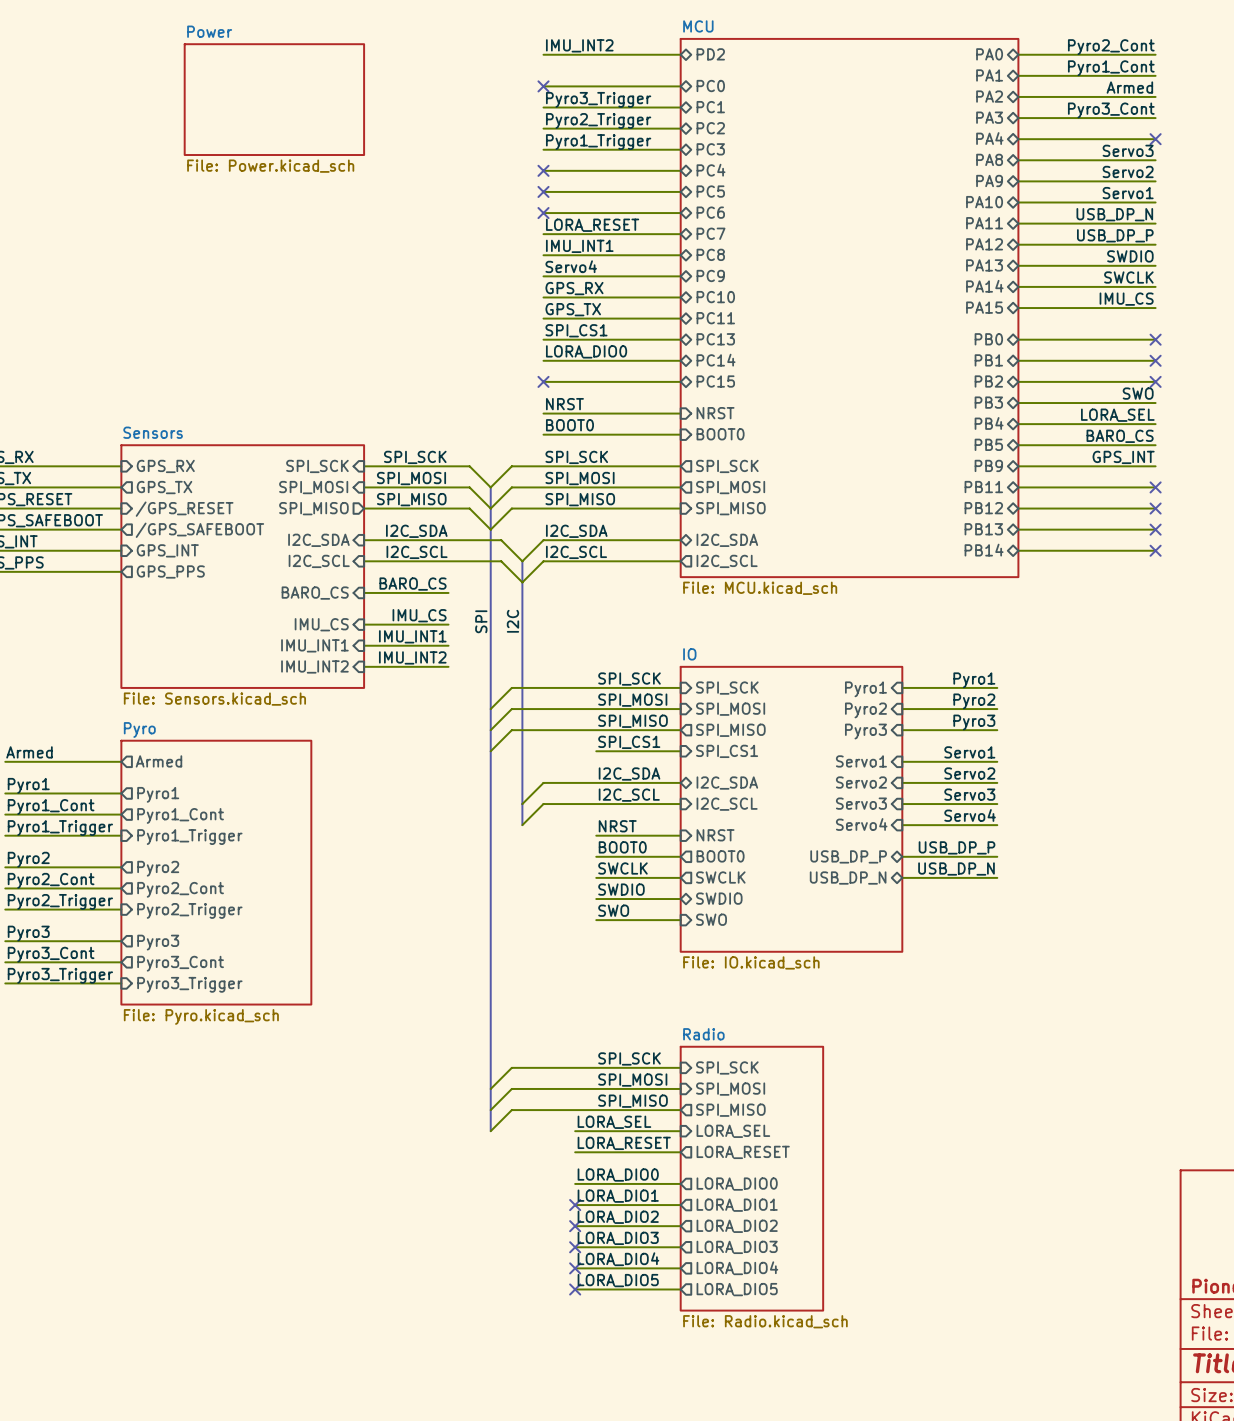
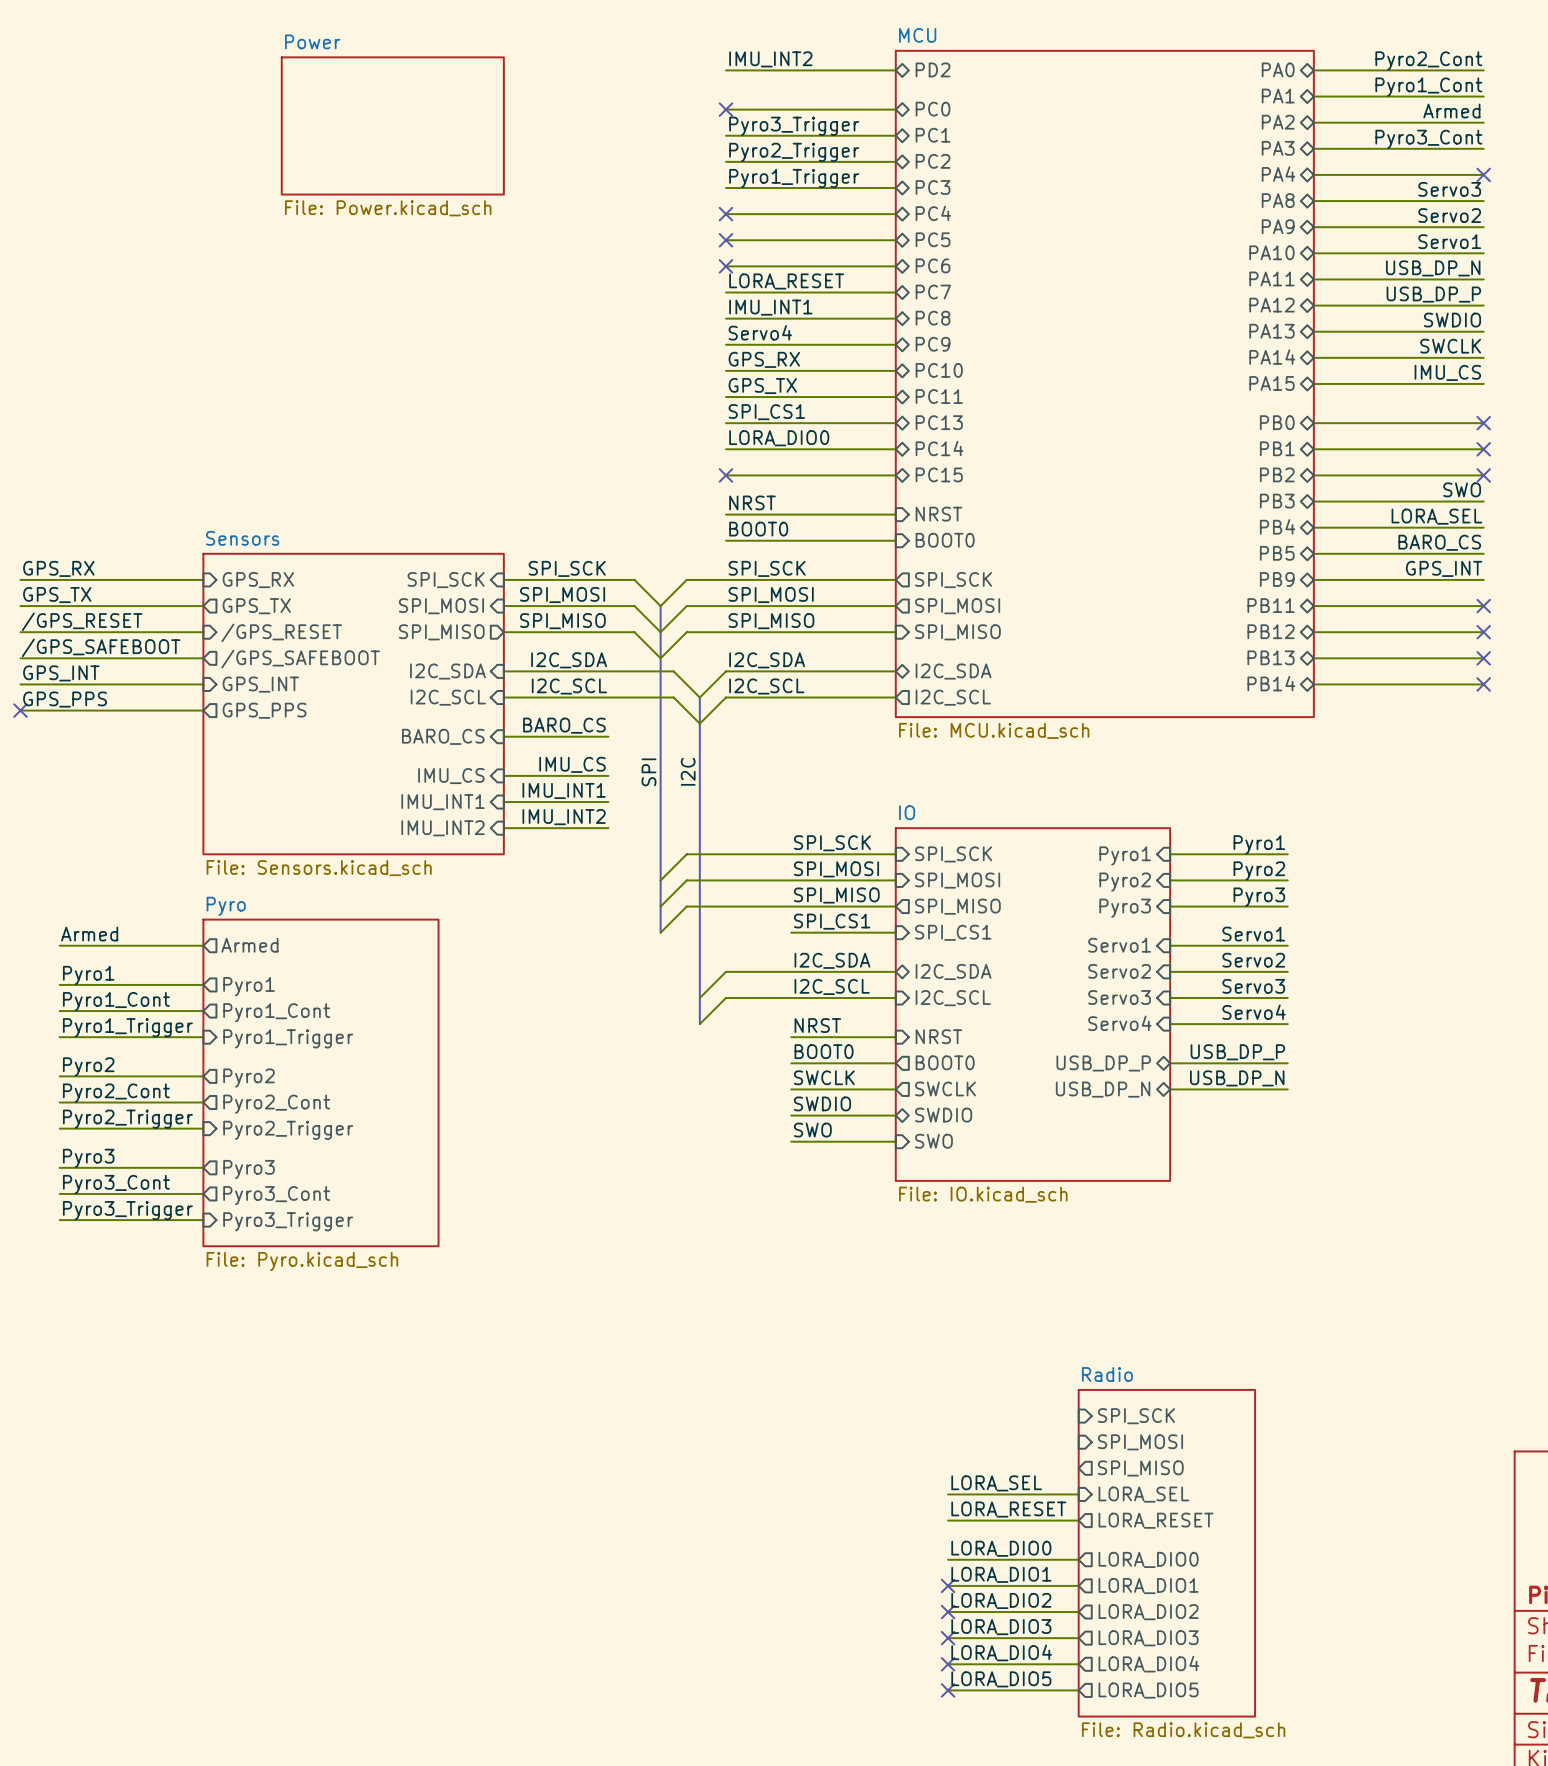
bus: (490, 751) (490, 1131) -> none
label: SPI_SCK (629, 1058) -> none
wire: (680, 1067) (511, 1067) (490, 1088) -> none
sheet pin position: SPI_SCK (727, 1067) -> SPI_SCK (1136, 1416)
label: SPI_MOSI (632, 1080) -> none
wire: (680, 1088) (511, 1088) (490, 1110) -> none
sheet pin position: SPI_MOSI (730, 1089) -> SPI_MOSI (1140, 1442)
label: SPI_MISO (633, 1101) -> none
wire: (680, 1110) (511, 1110) (490, 1131) -> none
sheet pin position: SPI_MISO (730, 1110) -> SPI_MISO (1140, 1468)
label position: LORA_SEL (614, 1122) -> LORA_SEL (996, 1483)
wire: (575, 1131) (680, 1131) -> (948, 1494) (1078, 1494)
sheet pin position: LORA_SEL (733, 1131) -> LORA_SEL (1143, 1494)
label position: LORA_RESET (624, 1143) -> LORA_RESET (1008, 1509)
wire: (575, 1152) (680, 1152) -> (948, 1520) (1078, 1520)
sheet pin position: LORA_RESET (743, 1152) -> LORA_RESET (1156, 1520)
label position: LORA_DIO0 (618, 1175) -> LORA_DIO0 (1001, 1548)
sheet Radio position: (751, 1178) -> (1166, 1553)
wire: (575, 1183) (680, 1183) -> (948, 1559) (1078, 1559)
sheet pin position: LORA_DIO0 (737, 1184) -> LORA_DIO0 (1148, 1559)
label position: LORA_DIO1 (618, 1196) -> LORA_DIO1 (1001, 1574)
wire: (575, 1205) (680, 1205) -> (948, 1585) (1078, 1585)
no-connect mark: (575, 1205) -> none
sheet pin position: LORA_DIO1 (737, 1205) -> LORA_DIO1 (1148, 1586)
label position: LORA_DIO2 (618, 1217) -> LORA_DIO2 (1001, 1600)
wire: (575, 1226) (680, 1226) -> (948, 1612) (1078, 1612)
no-connect mark: (575, 1226) -> none
sheet pin position: LORA_DIO2 (737, 1226) -> LORA_DIO2 (1148, 1612)
label position: LORA_DIO3 (618, 1238) -> LORA_DIO3 (1001, 1627)
wire: (575, 1247) (680, 1247) -> (948, 1638) (1078, 1638)
no-connect mark: (575, 1247) -> none
sheet pin position: LORA_DIO3 (737, 1247) -> LORA_DIO3 (1148, 1638)
label position: LORA_DIO4 (618, 1259) -> LORA_DIO4 (1001, 1652)
wire: (575, 1268) (680, 1268) -> (948, 1664) (1078, 1664)
no-connect mark: (575, 1268) -> none
sheet pin position: LORA_DIO4 (737, 1268) -> LORA_DIO4 (1148, 1664)
no-connect mark: none -> (948, 1585)
label position: LORA_DIO5 (618, 1280) -> LORA_DIO5 (1001, 1679)
wire: (575, 1289) (680, 1289) -> (948, 1690) (1078, 1690)
no-connect mark: (575, 1289) -> none
sheet pin position: LORA_DIO5 (737, 1289) -> LORA_DIO5 (1148, 1690)
no-connect mark: none -> (948, 1612)
no-connect mark: none -> (948, 1638)
no-connect mark: none -> (948, 1664)
no-connect mark: none -> (948, 1690)

